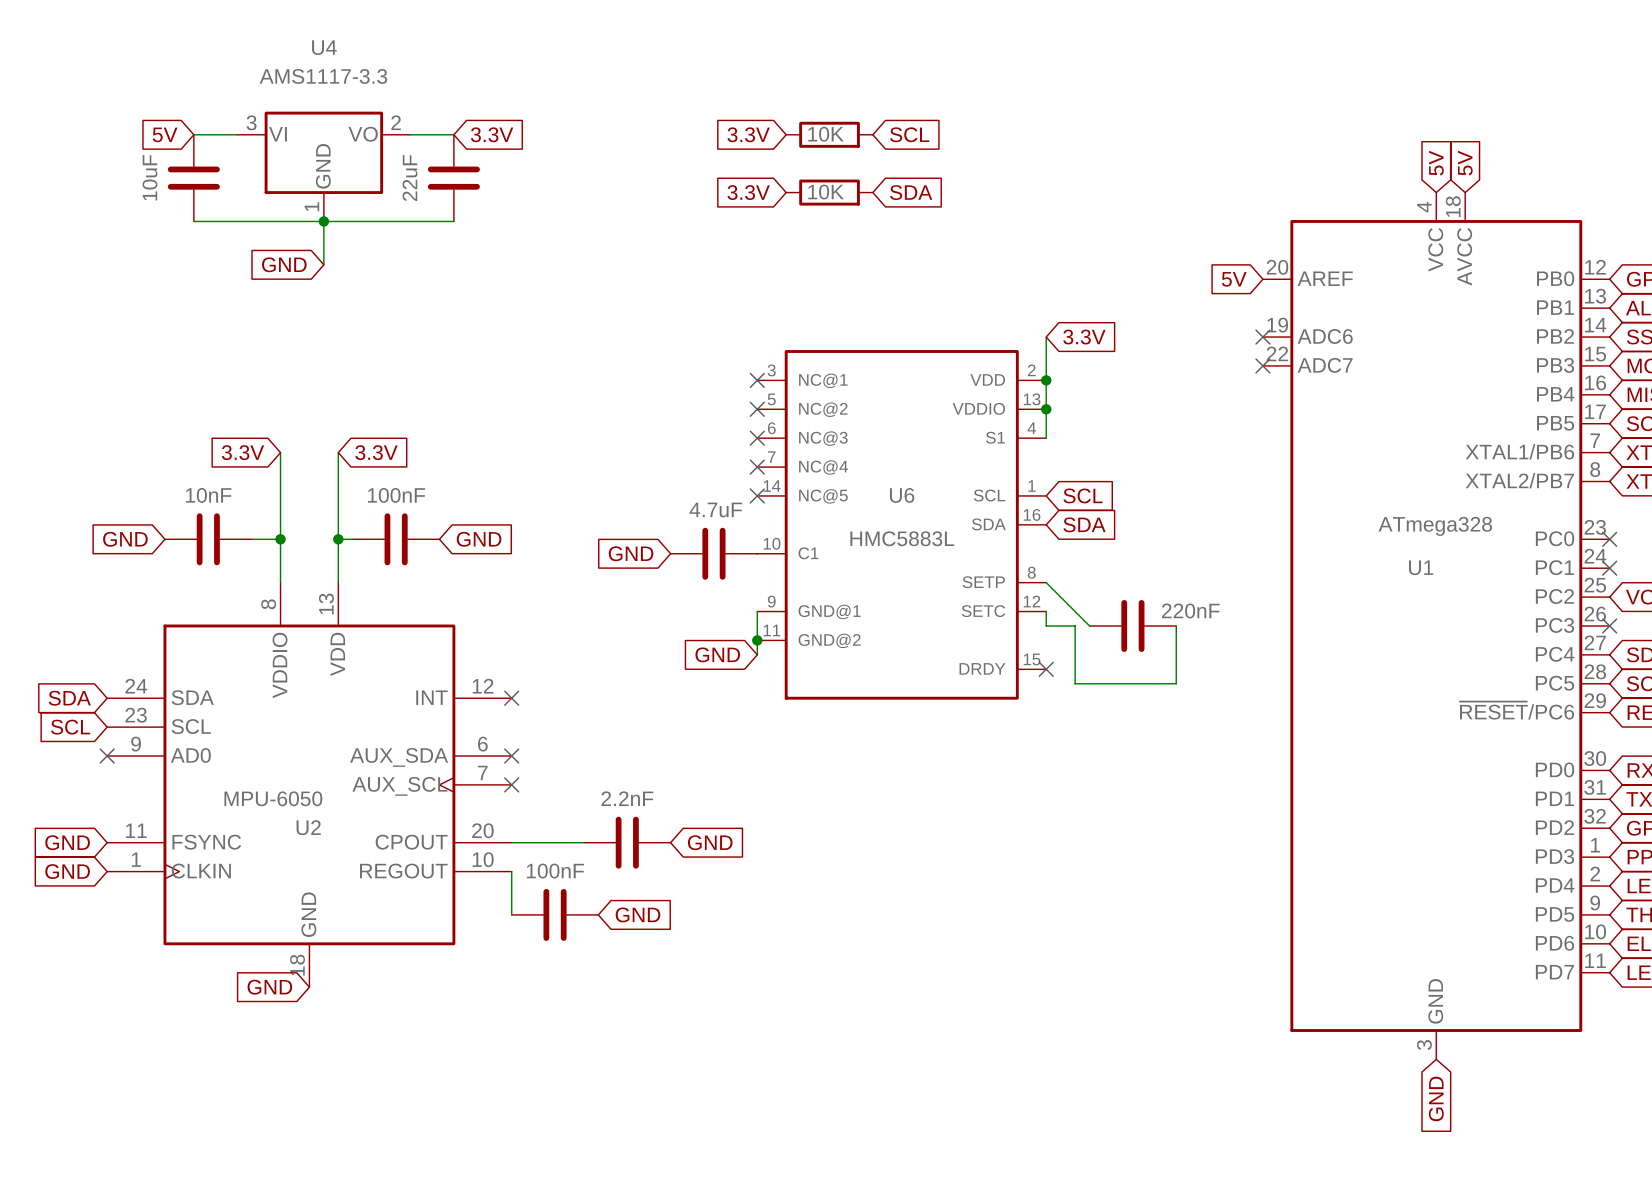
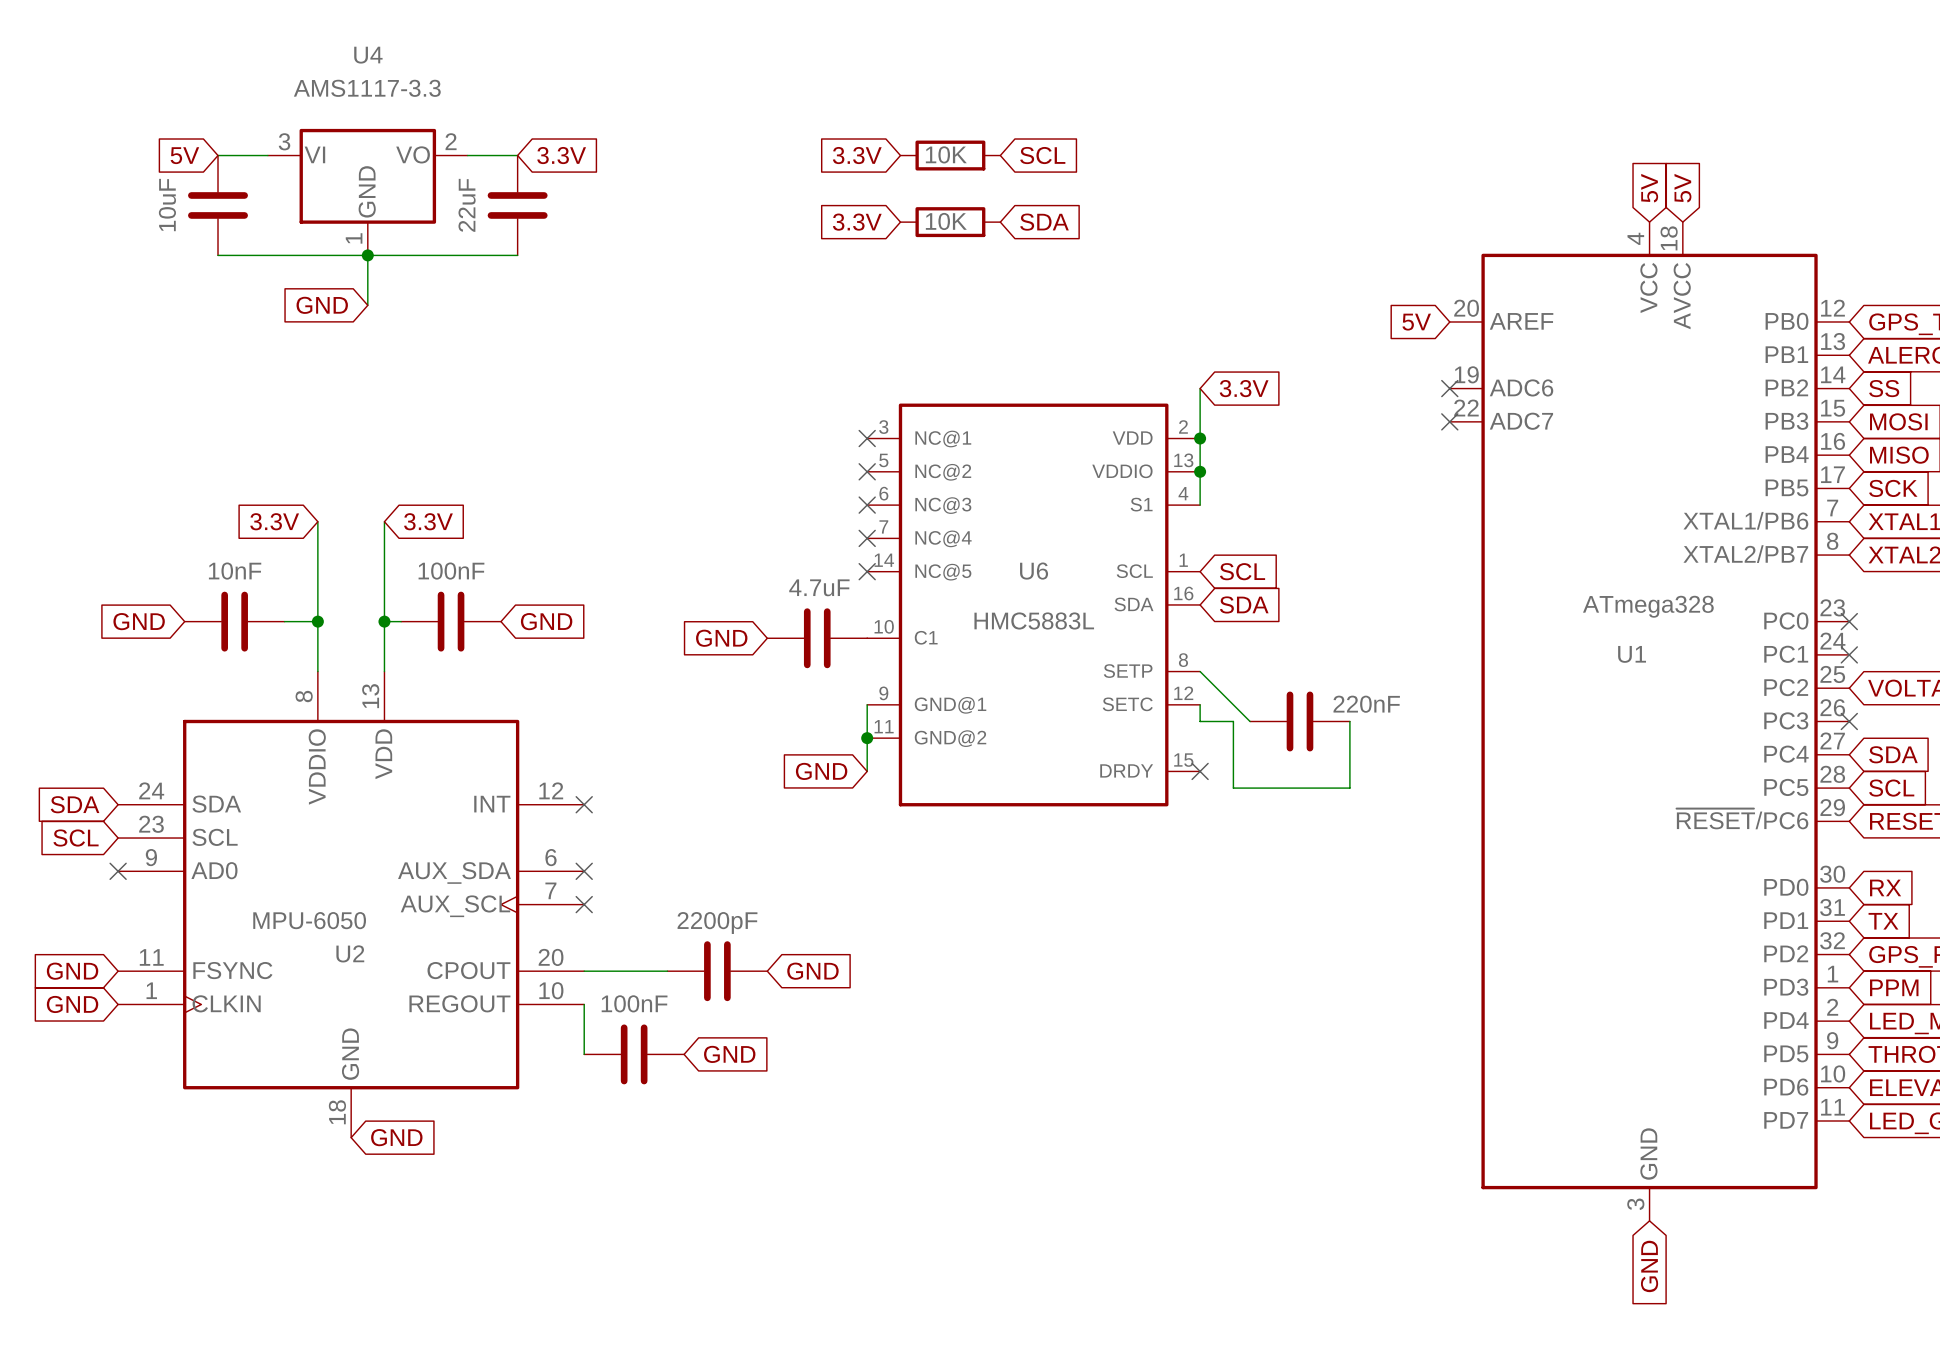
global label position: GND (717, 654) -> GND (821, 771)
wire: none -> (867, 754) (867, 771)
part value: 2.2nF (627, 798) -> 2200pF (717, 923)
global label rotation: 0° (269, 987) -> 180° (396, 1137)

